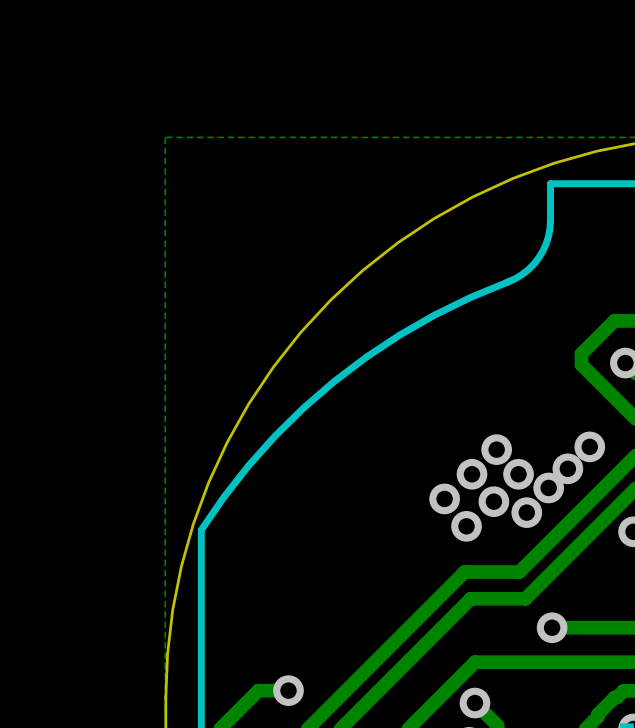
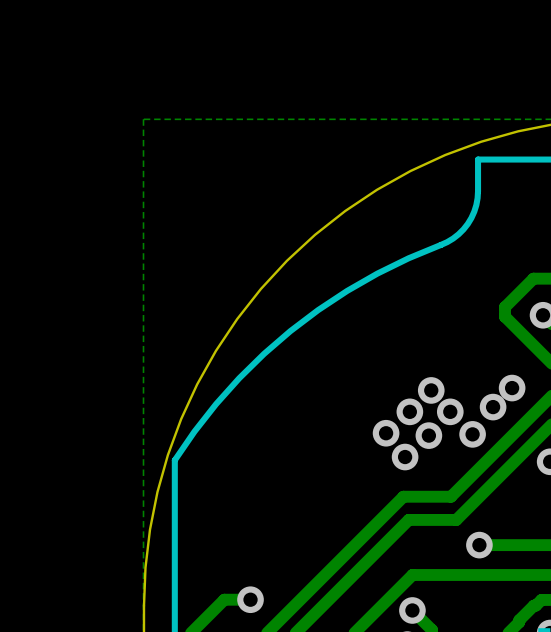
via: (548, 487) -> none
via: none -> (472, 434)
via: (526, 512) -> none

